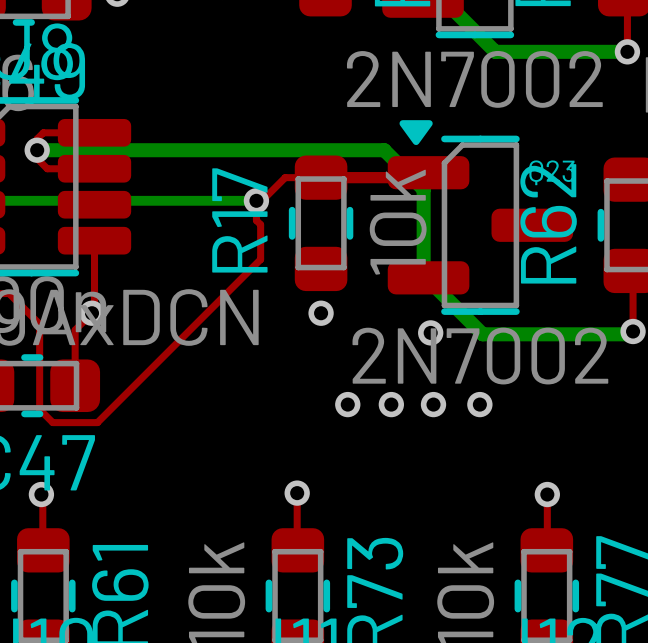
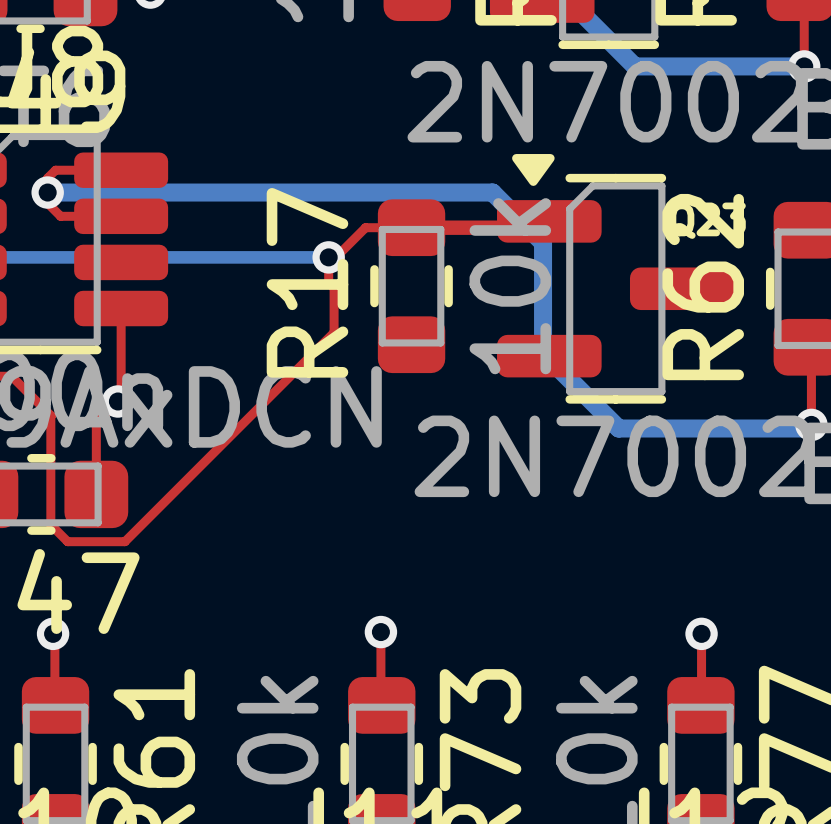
via: (321, 313) -> none
via: (430, 332) -> none
via: (347, 404) -> none
via: (391, 404) -> none
via: (433, 404) -> none
via: (479, 404) -> none

